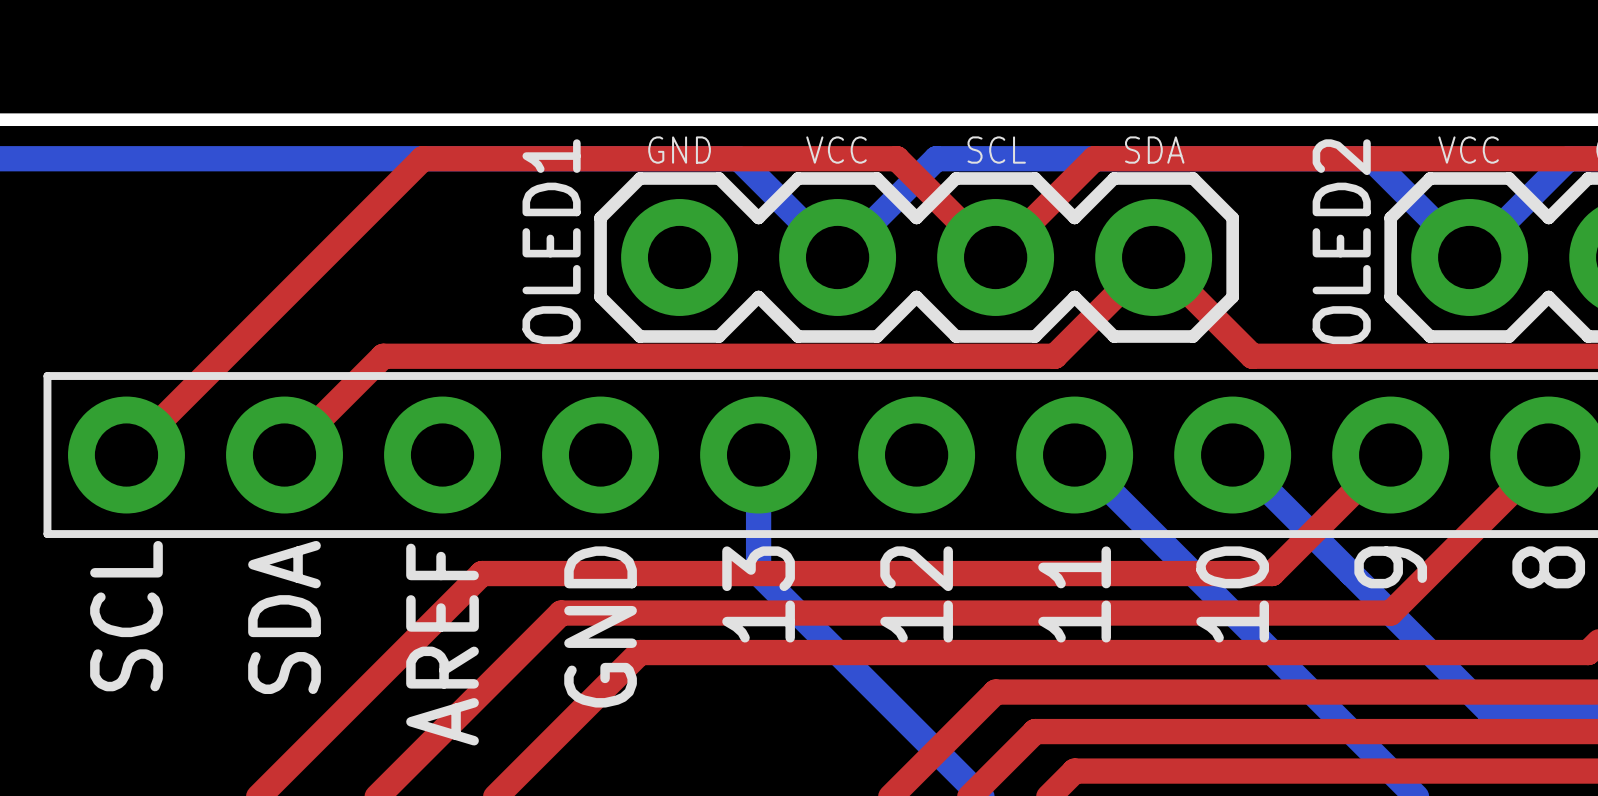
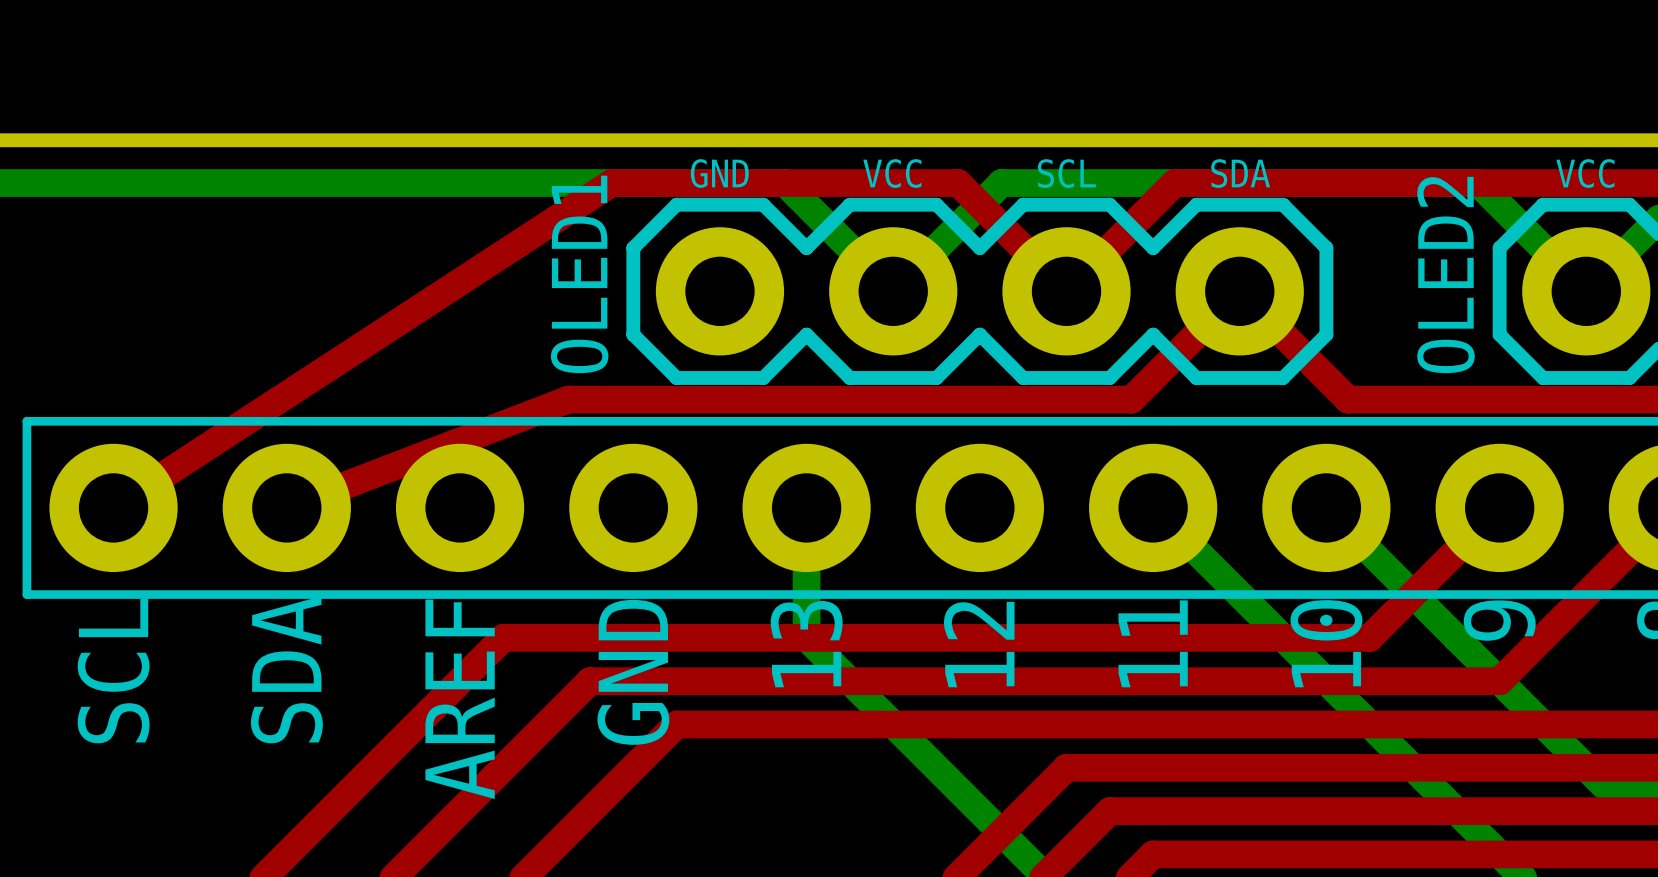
top track: (580, 158) (422, 158) (126, 455) -> (611, 183) (113, 507)
top track: (541, 356) (383, 356) (284, 455) -> (568, 399) (286, 507)

